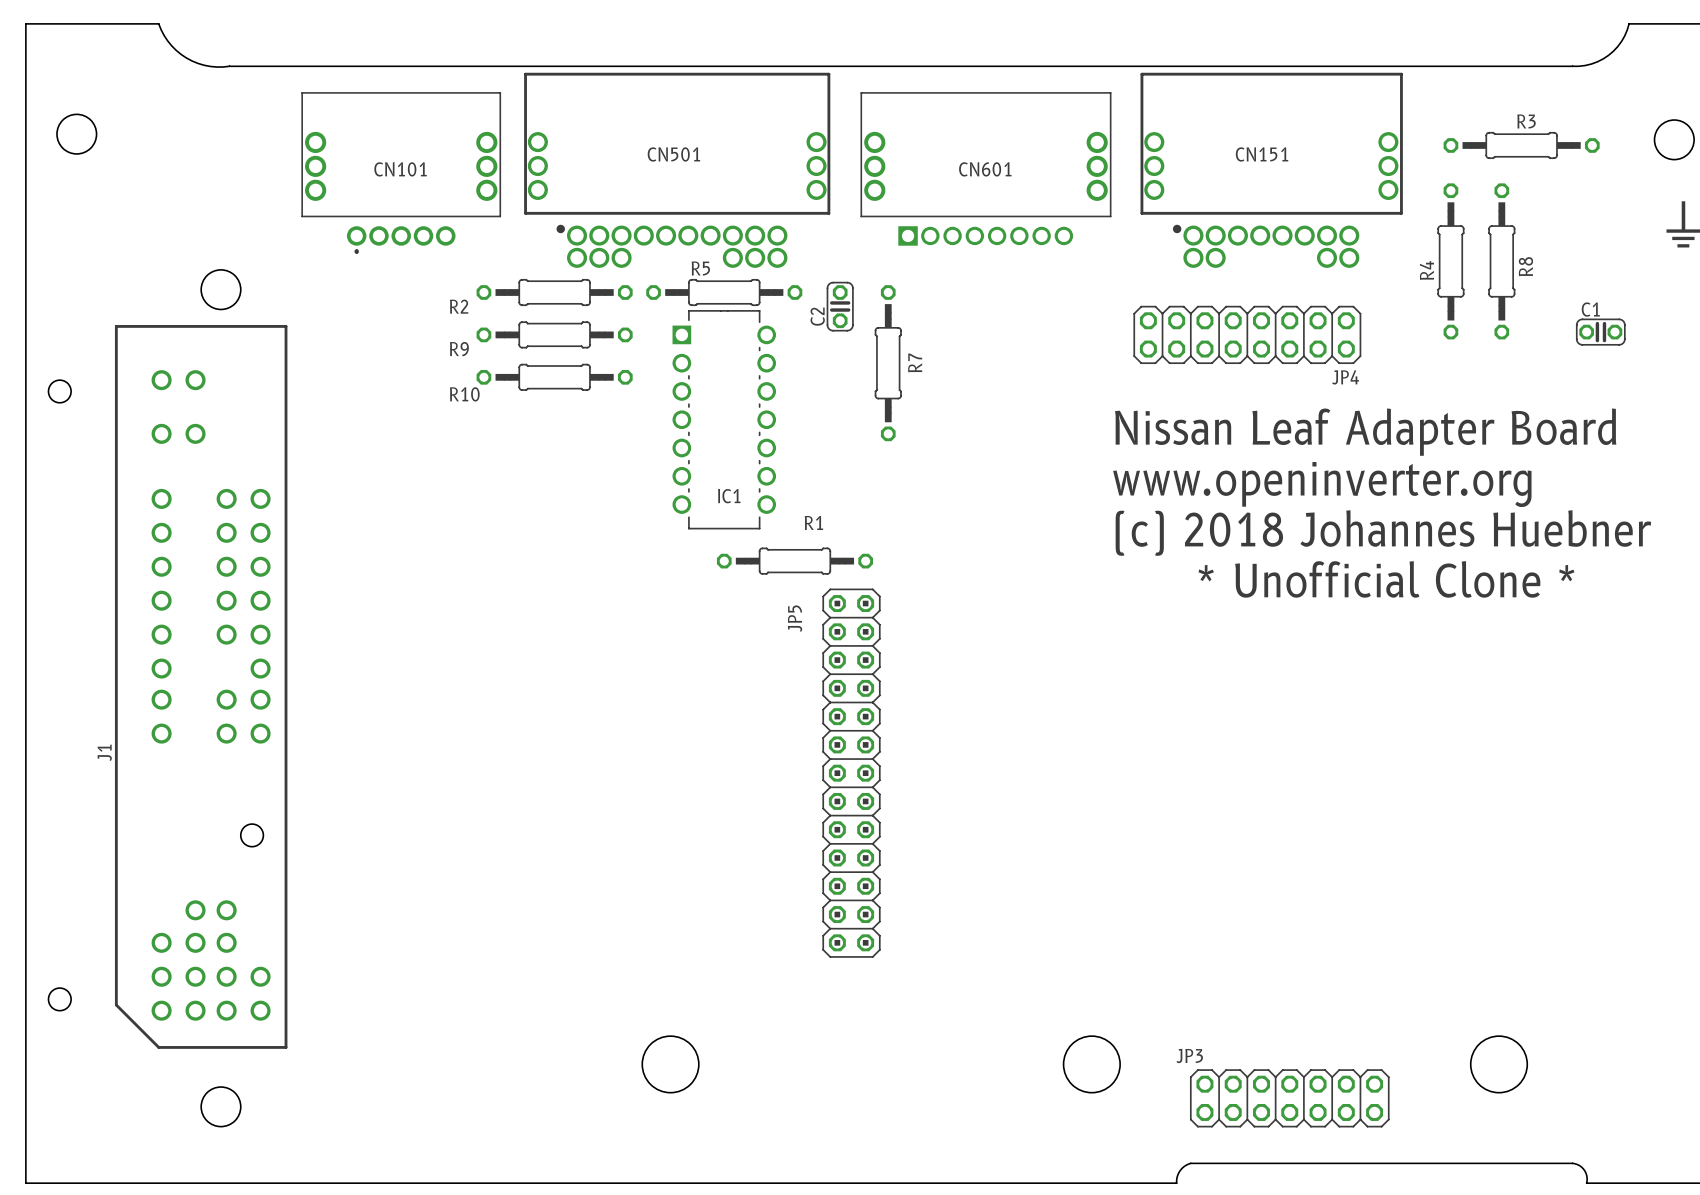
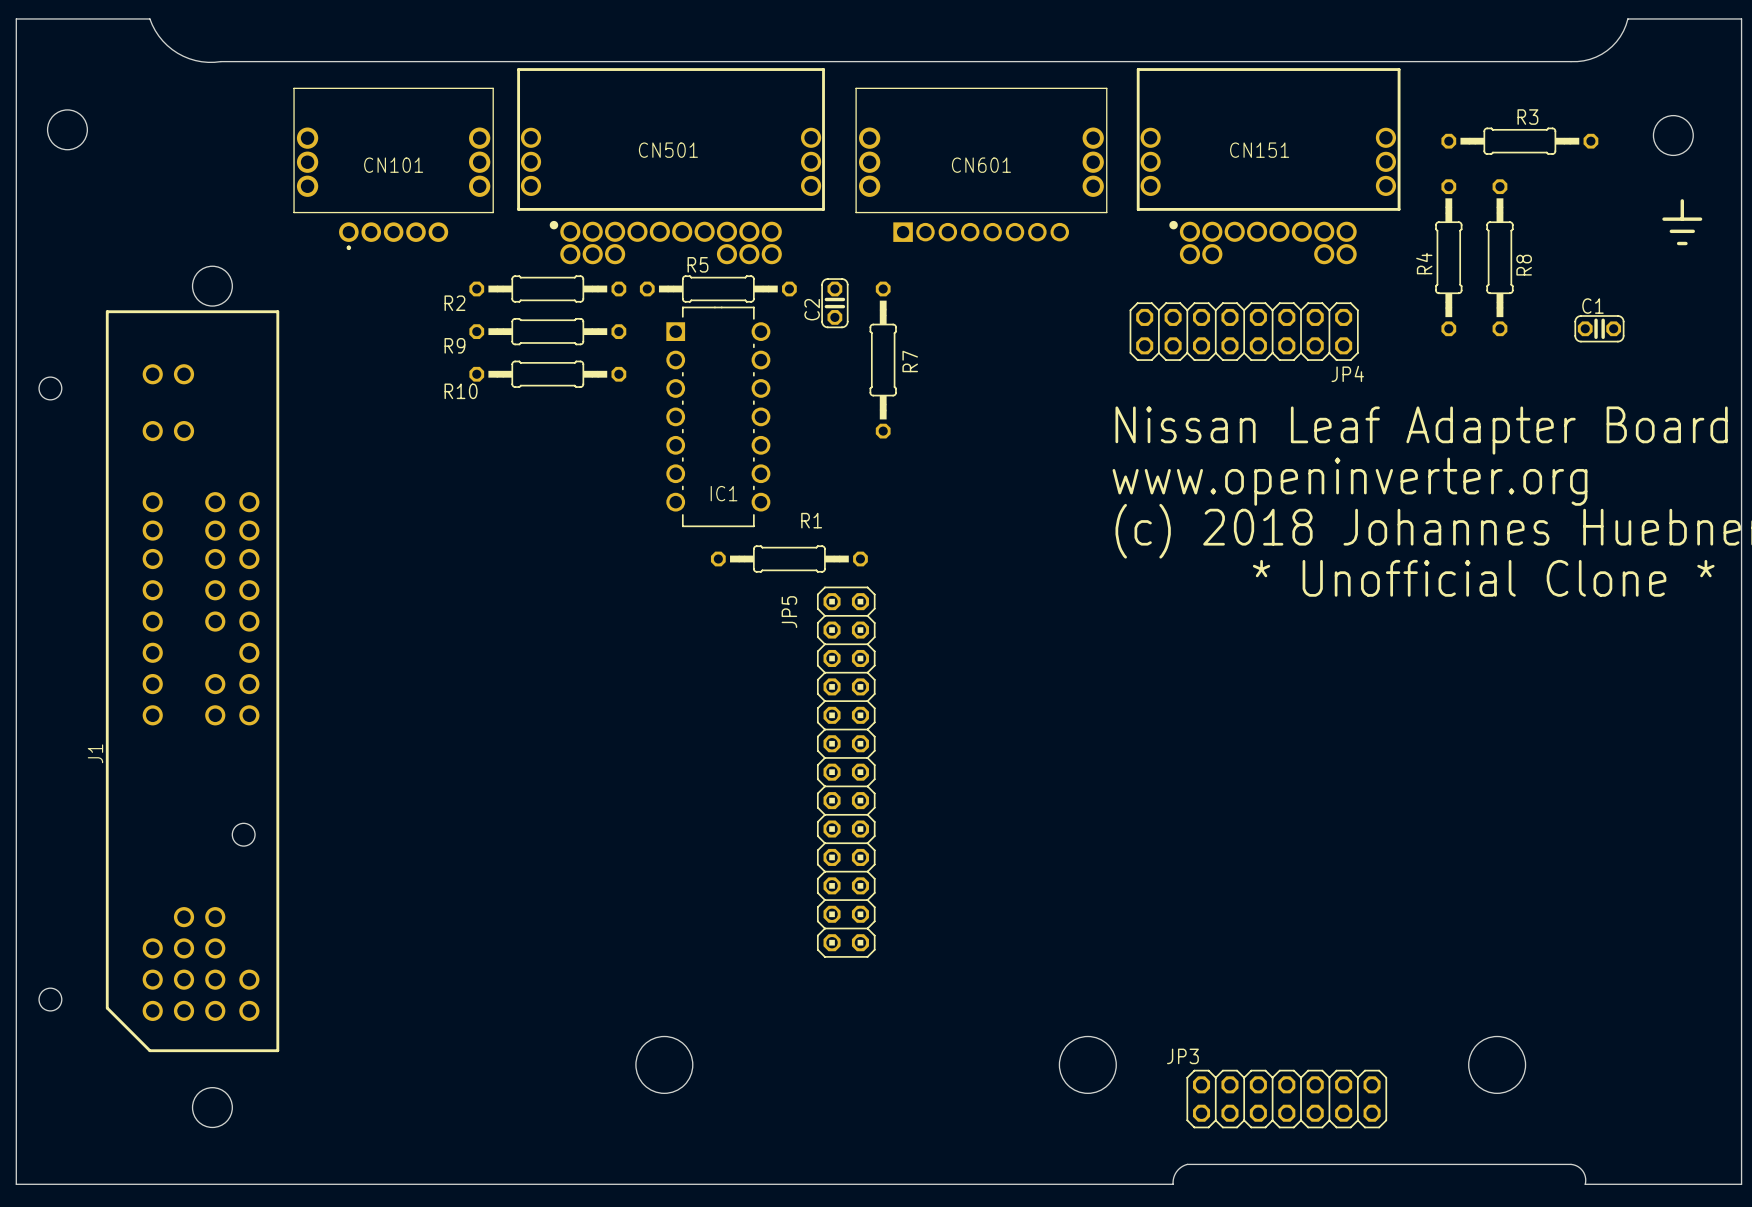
J1 footprint: [114, 325, 288, 1049] -> [105, 310, 280, 1053]

